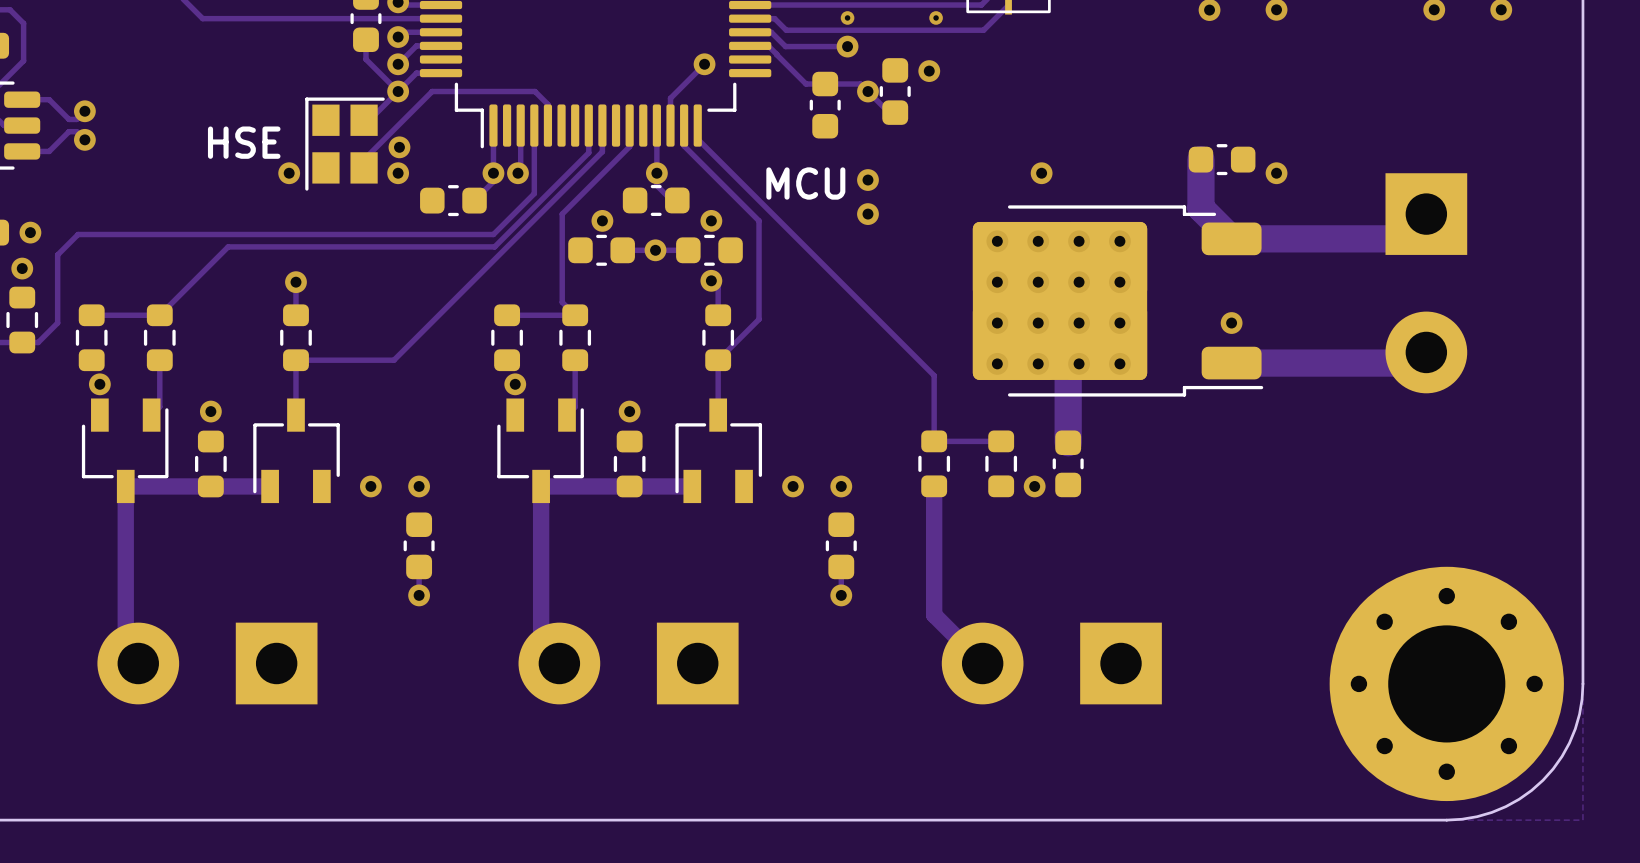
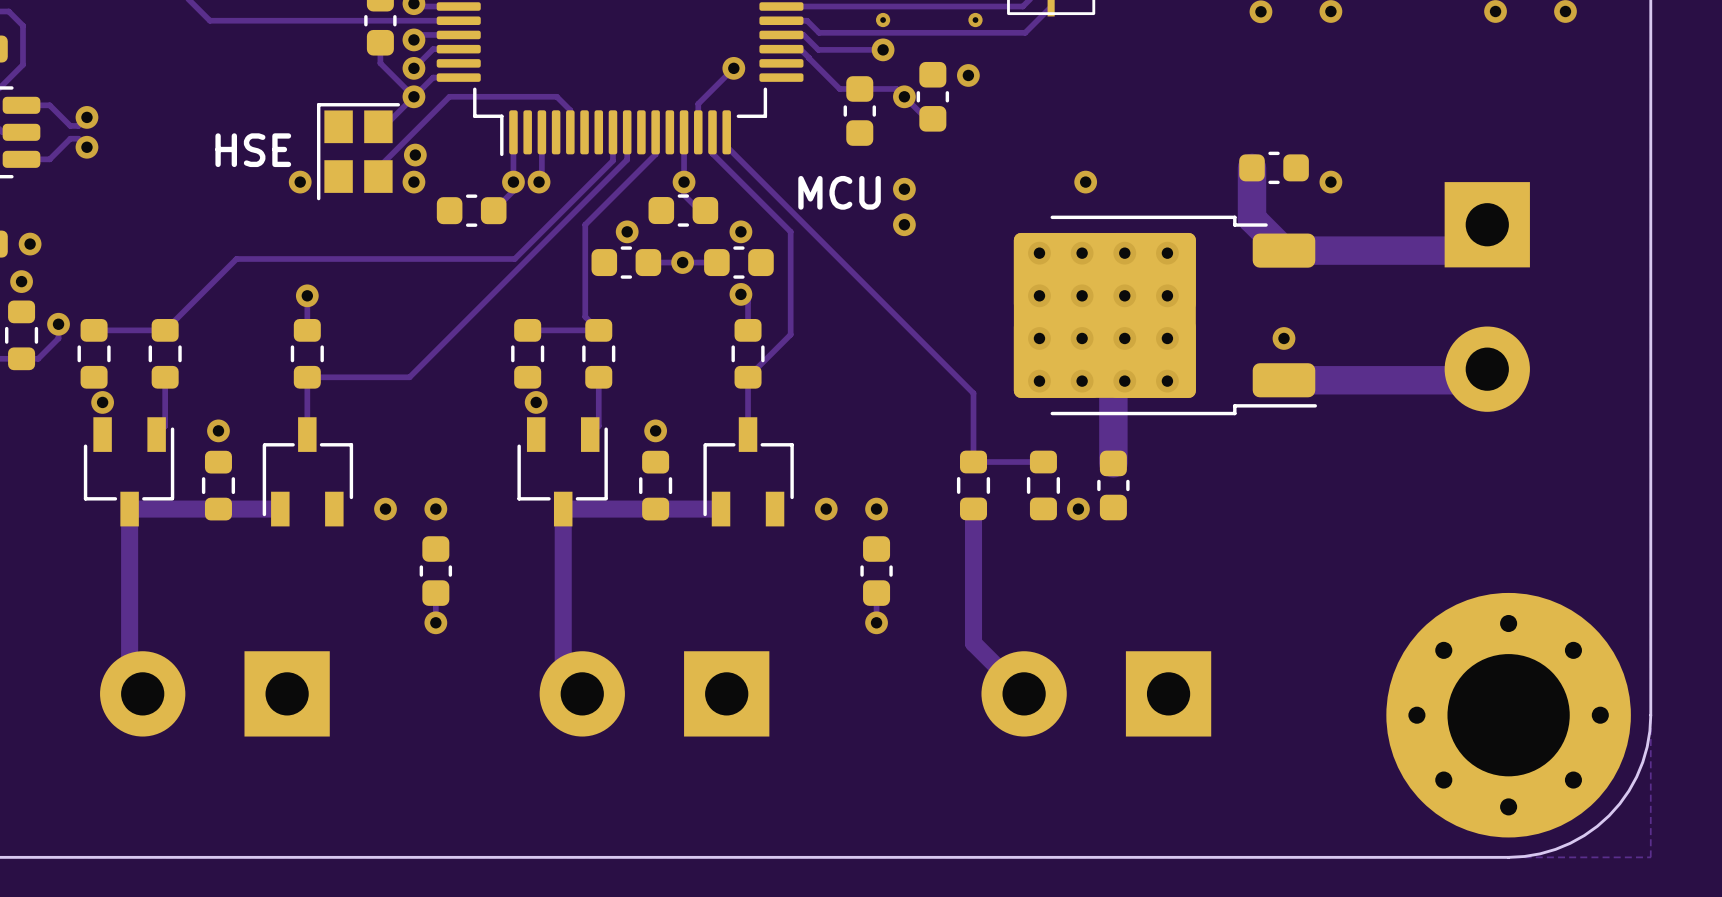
track: (534, 125) (534, 193) (493, 234) (78, 234) (57, 254) (57, 309) -> none
via: none -> (58, 324)

